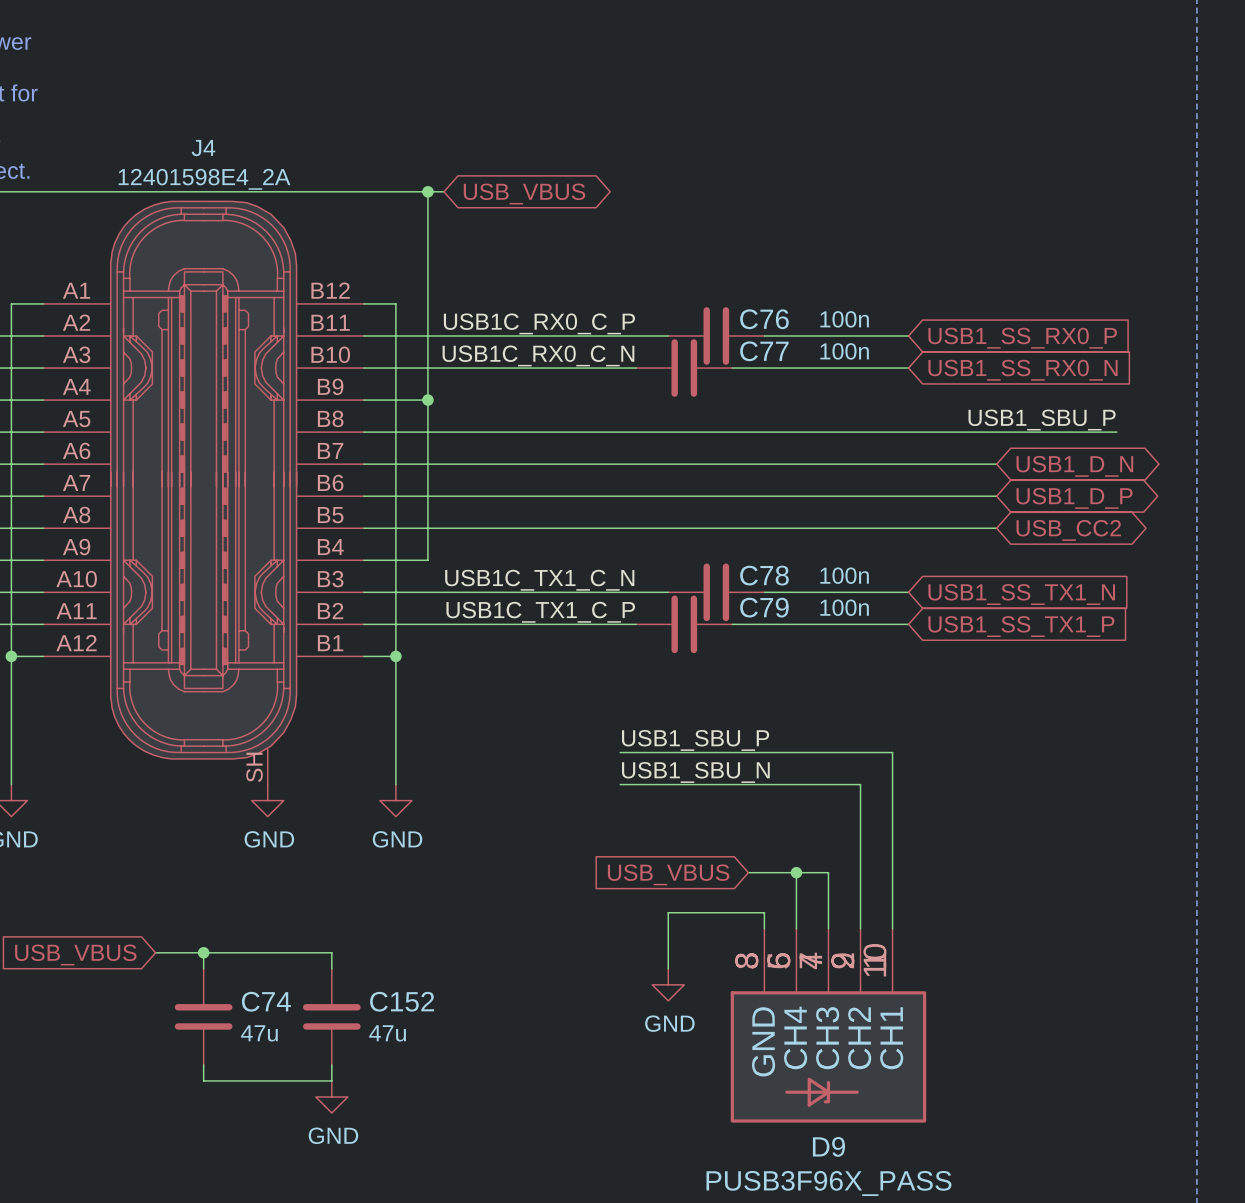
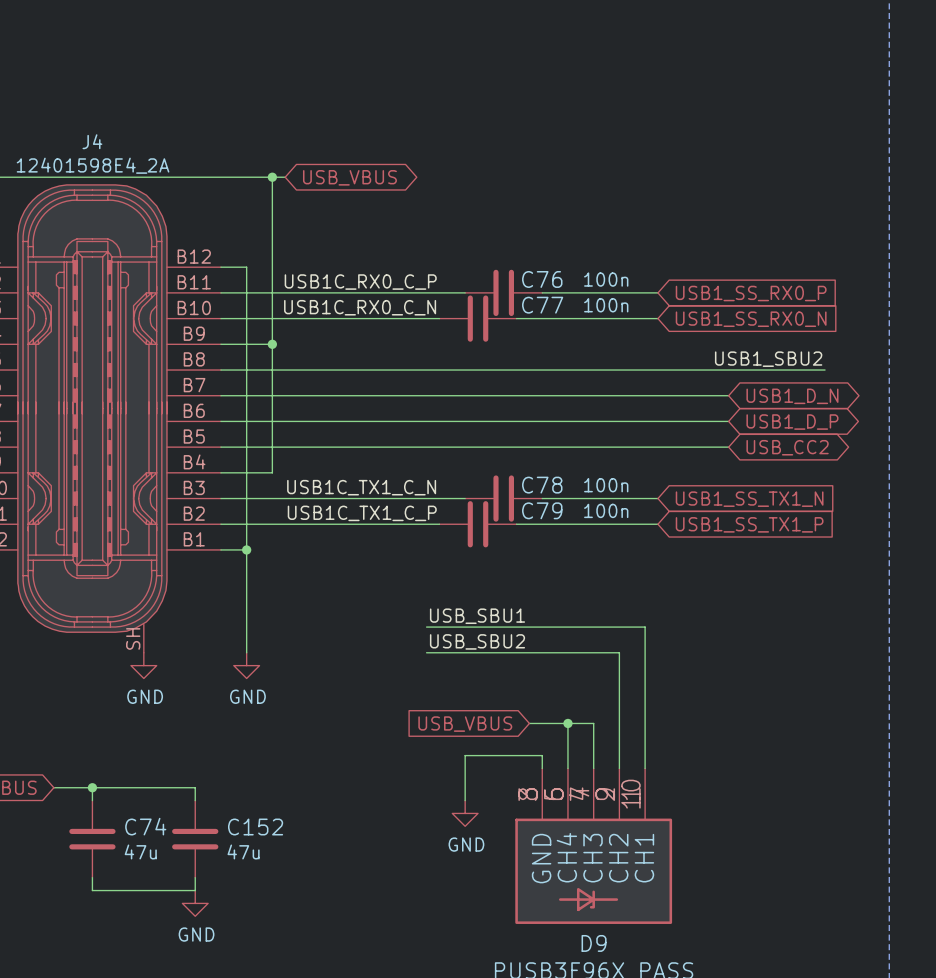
label: USB1_SBU_P (1042, 420) -> USB1_SBU2 (768, 359)
label: USB1_SBU_P (695, 740) -> USB_SBU1 (477, 616)
label: USB1_SBU_N (695, 772) -> USB_SBU2 (477, 641)

